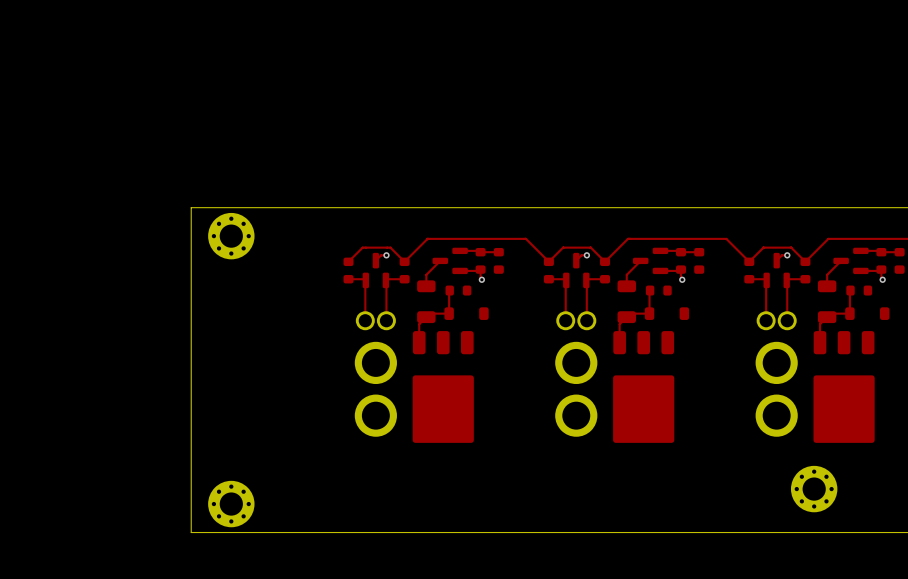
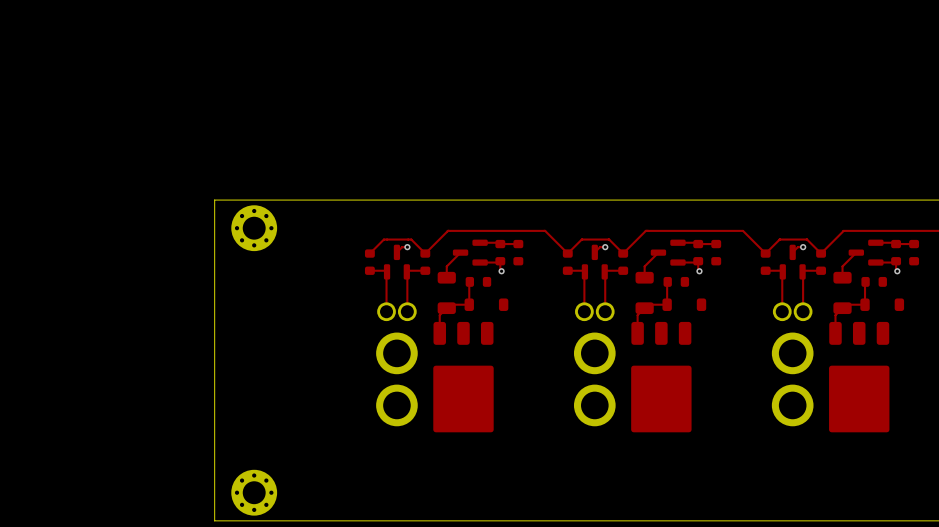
part: (814, 489) -> none

